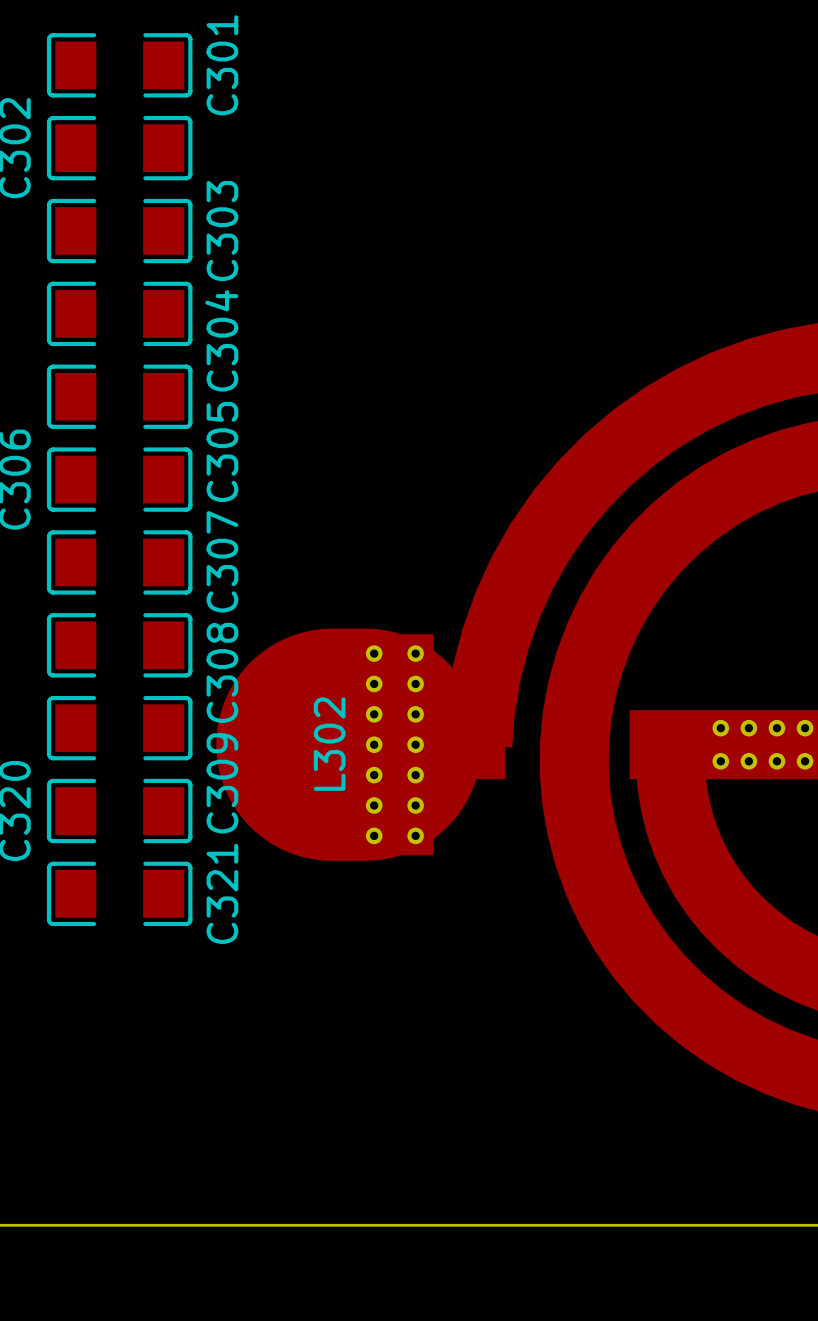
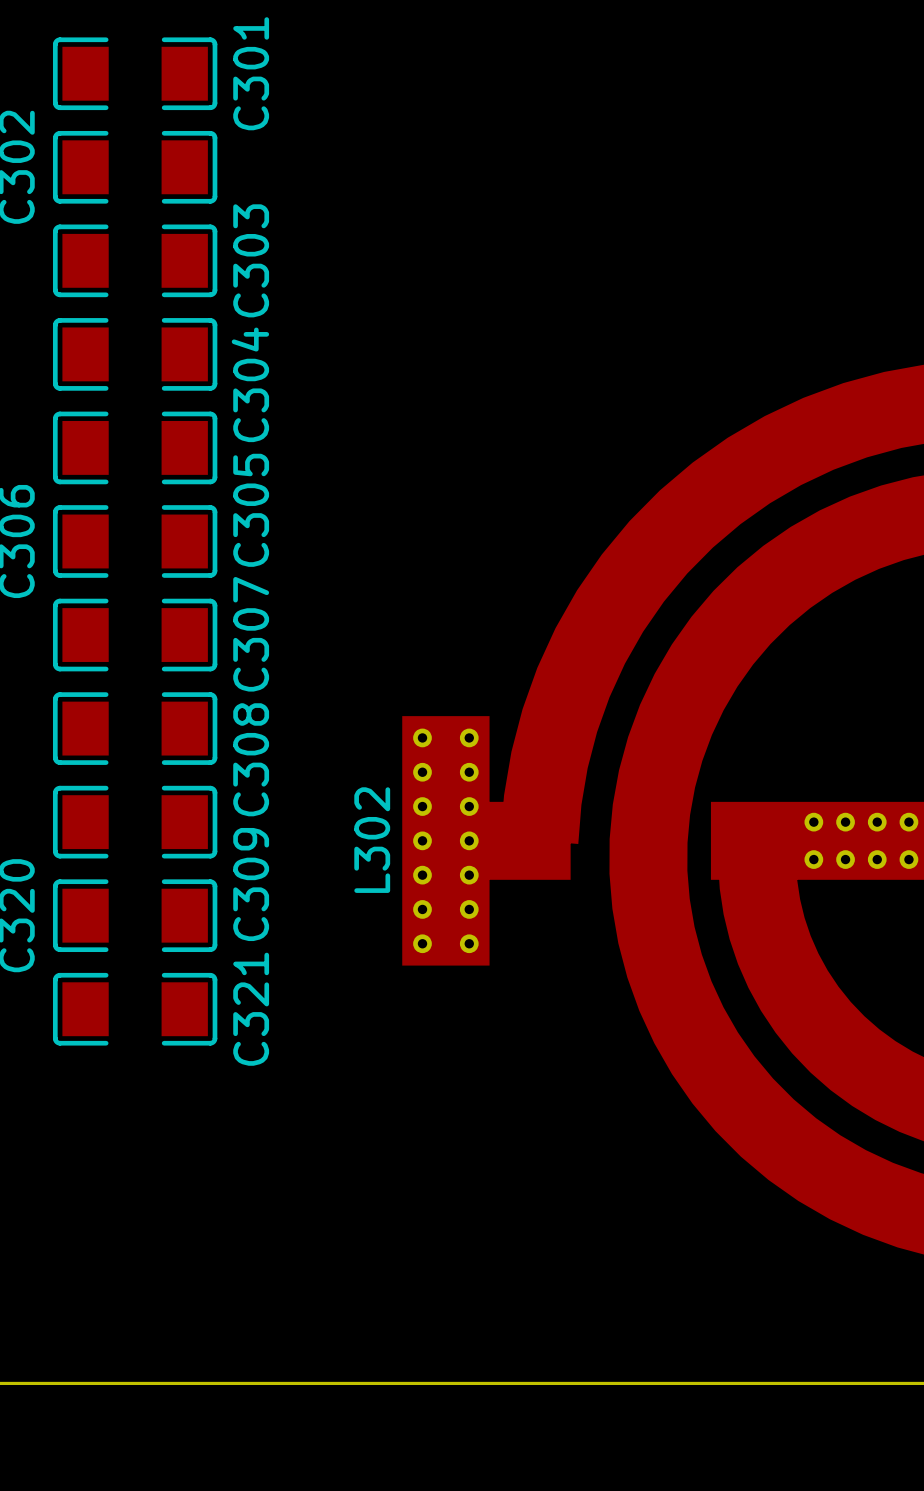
track: (332, 744) (365, 744) -> none

